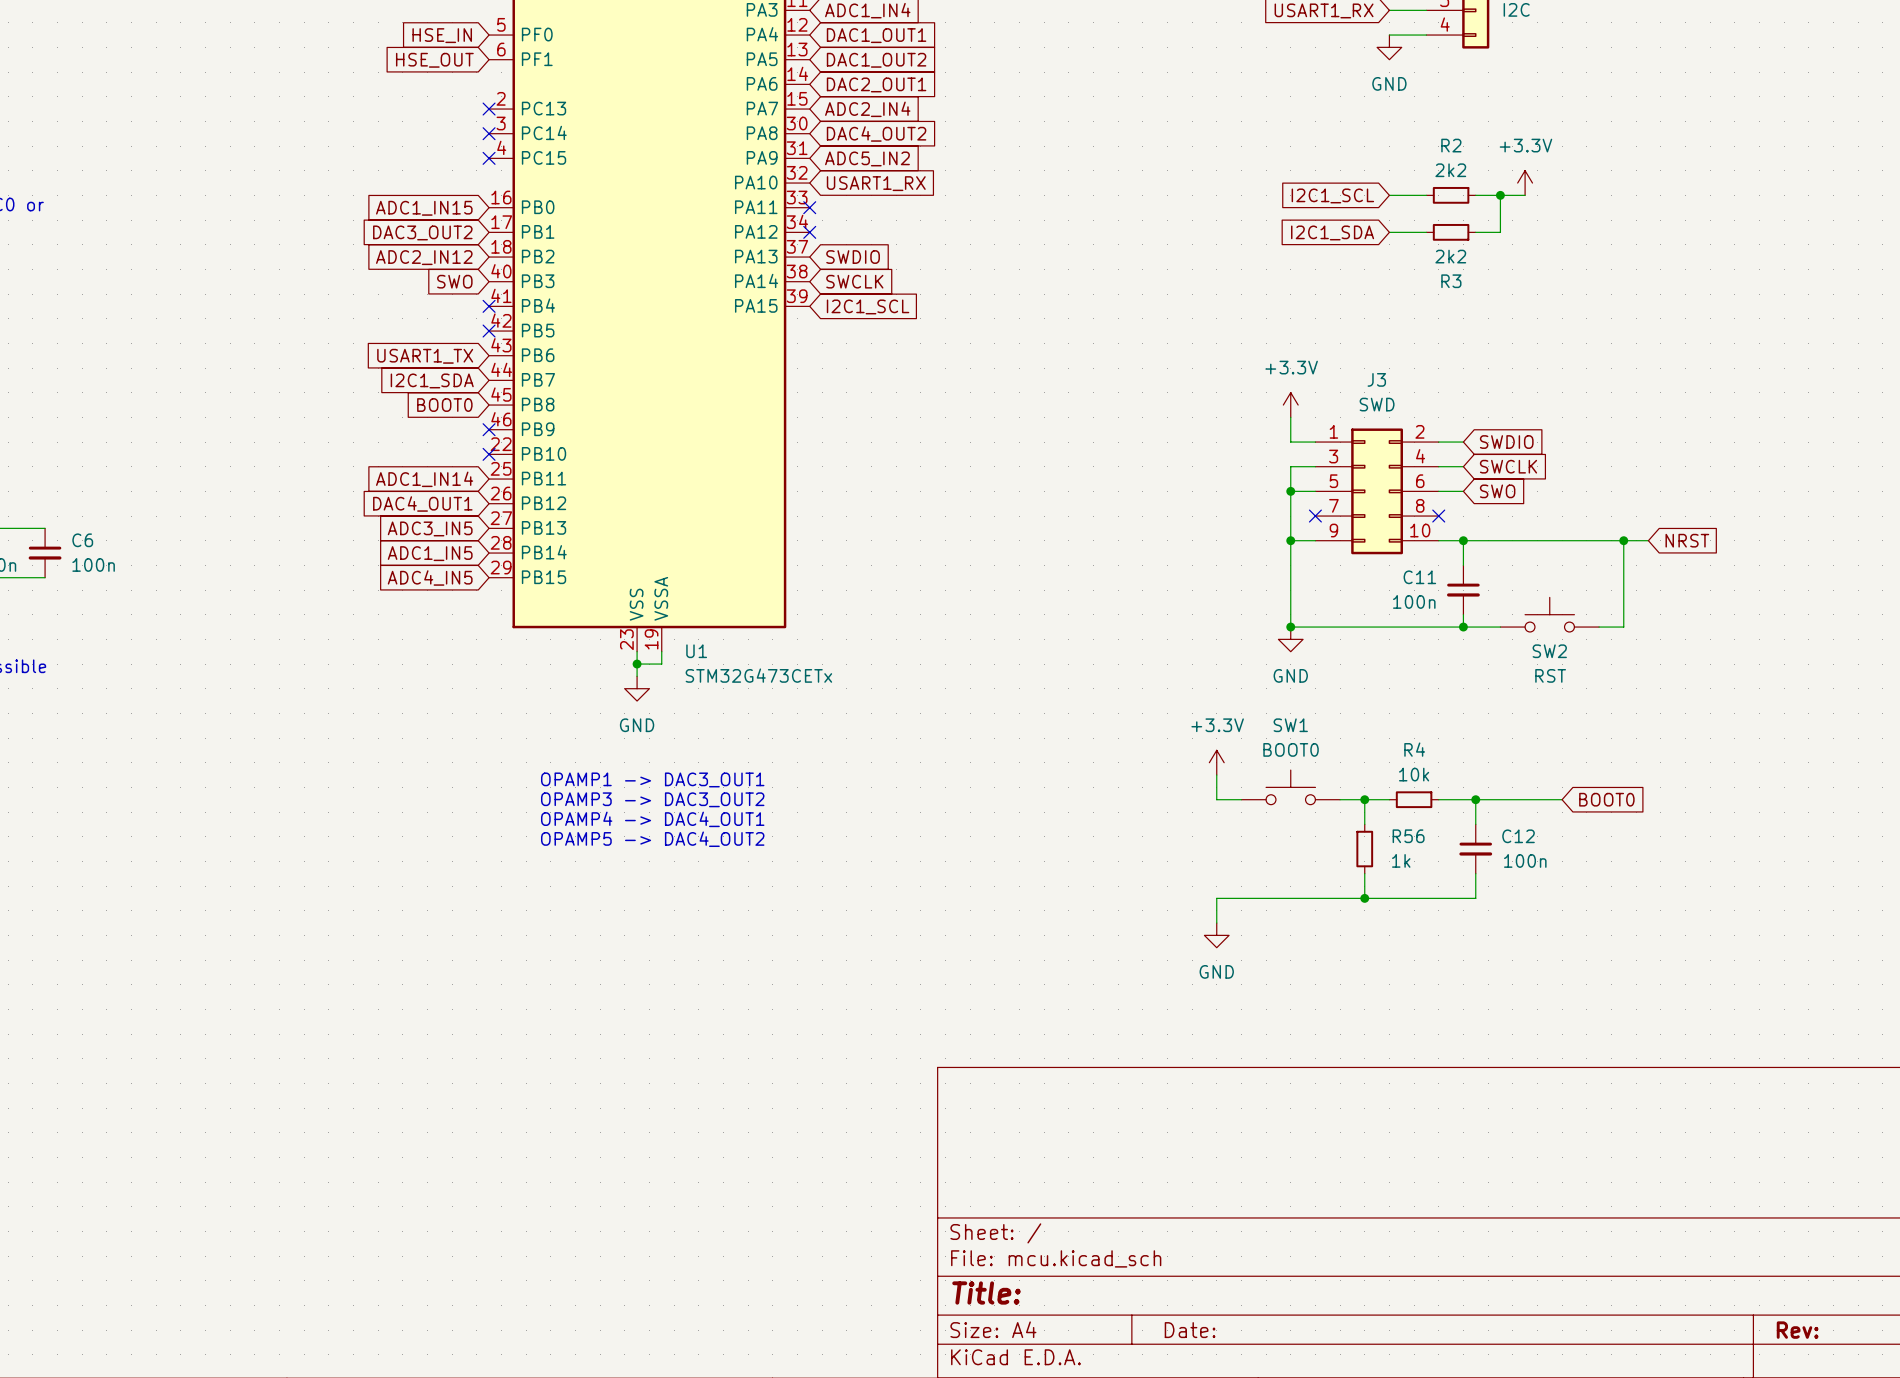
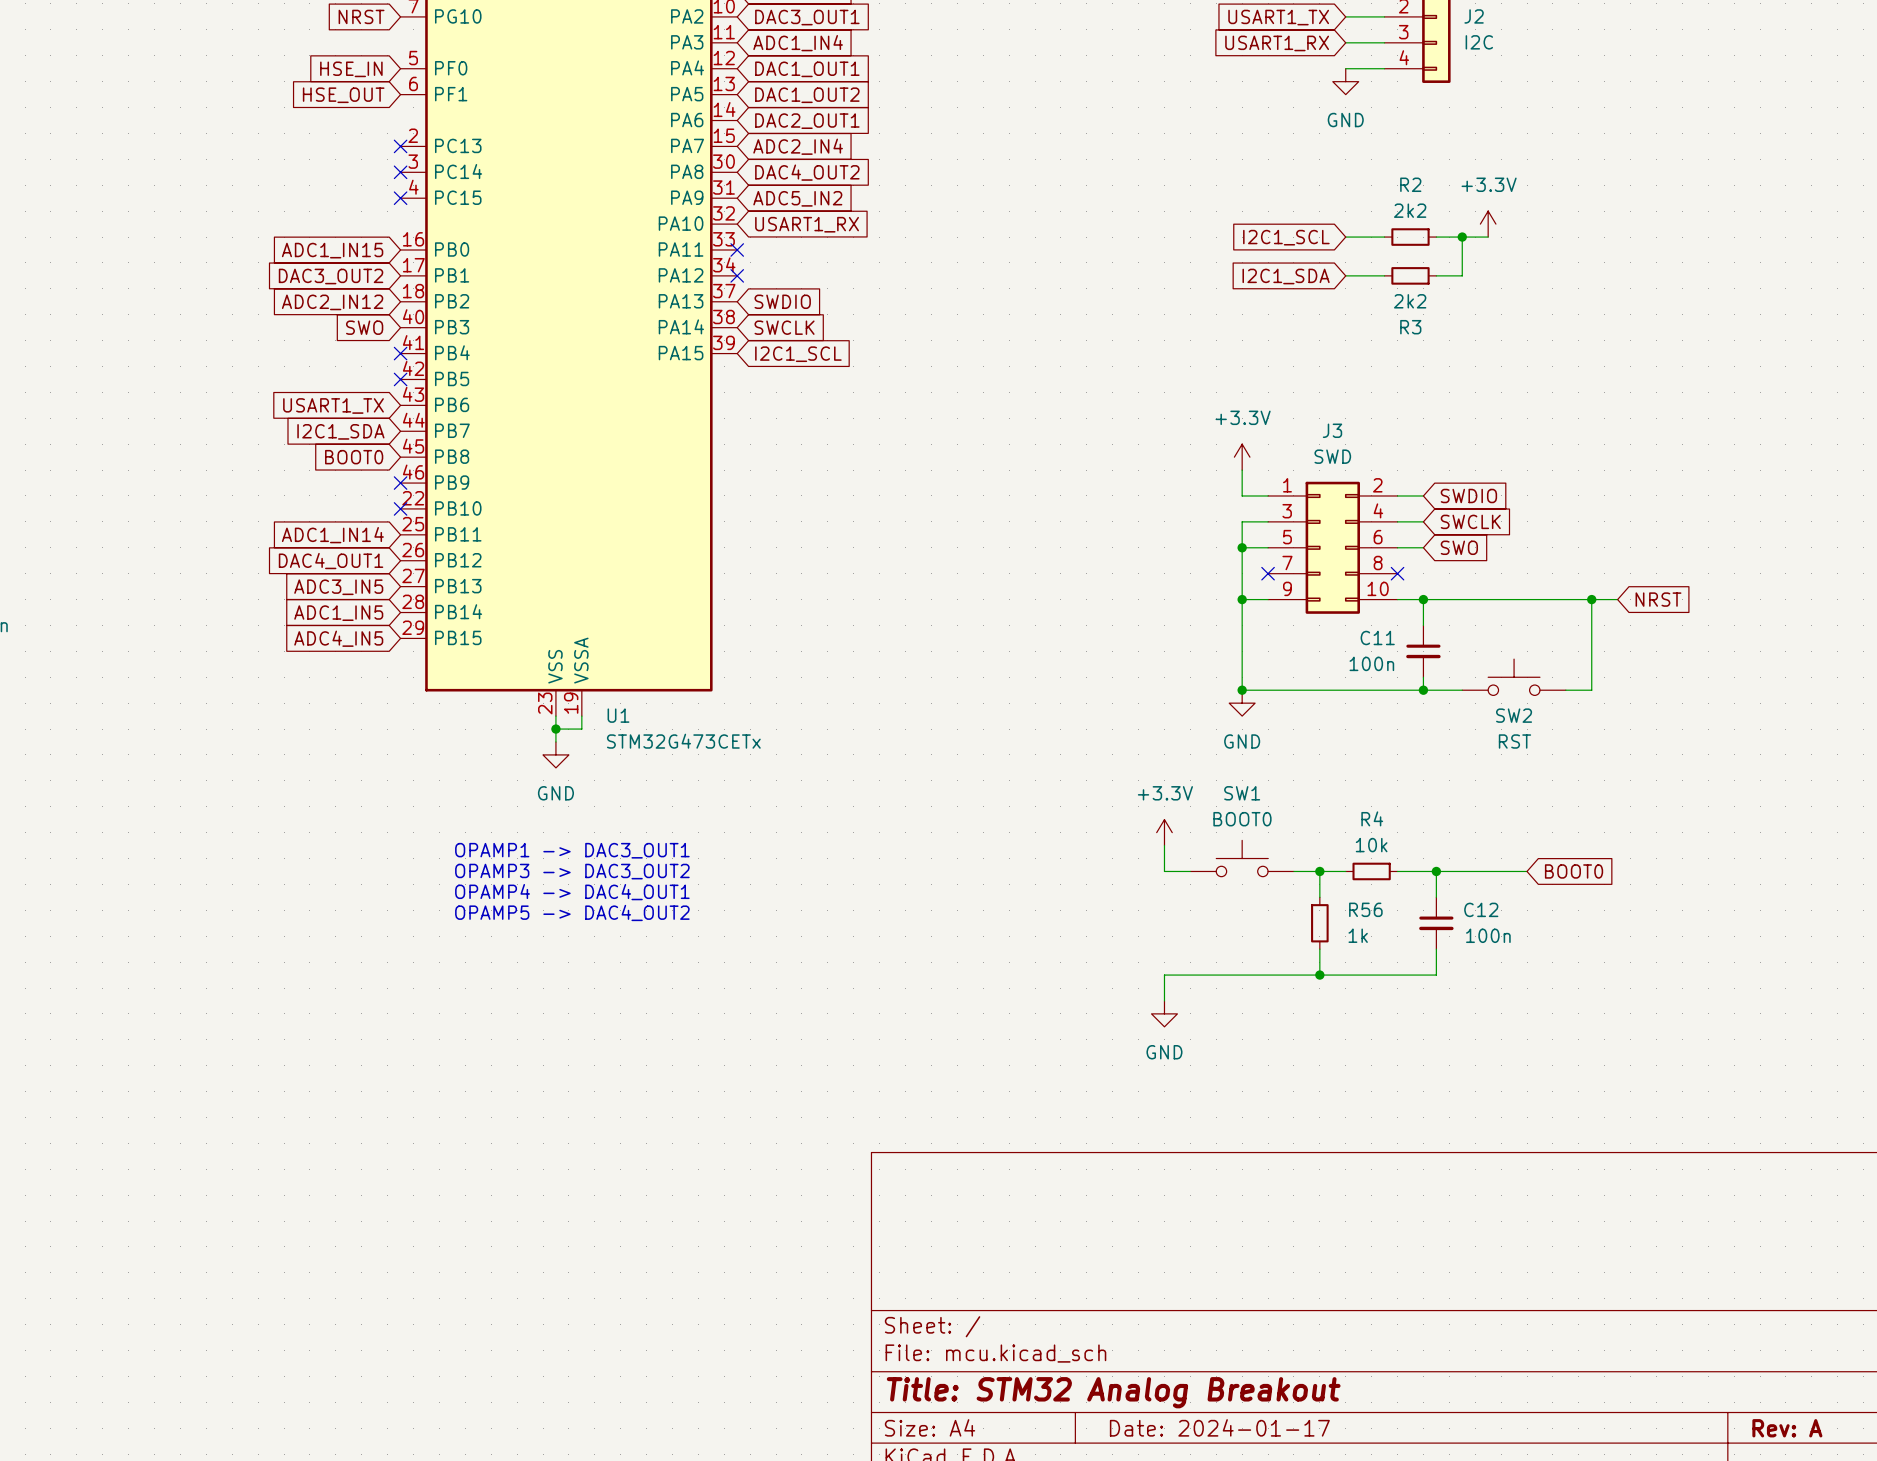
title block: Title: (986, 1293) -> Title: STM32 Analog Breakout (1113, 1392)
title block: Date: (1190, 1330) -> Date: 2024-01-17 (1219, 1427)
title block: Rev: (1797, 1330) -> Rev: A (1787, 1428)

